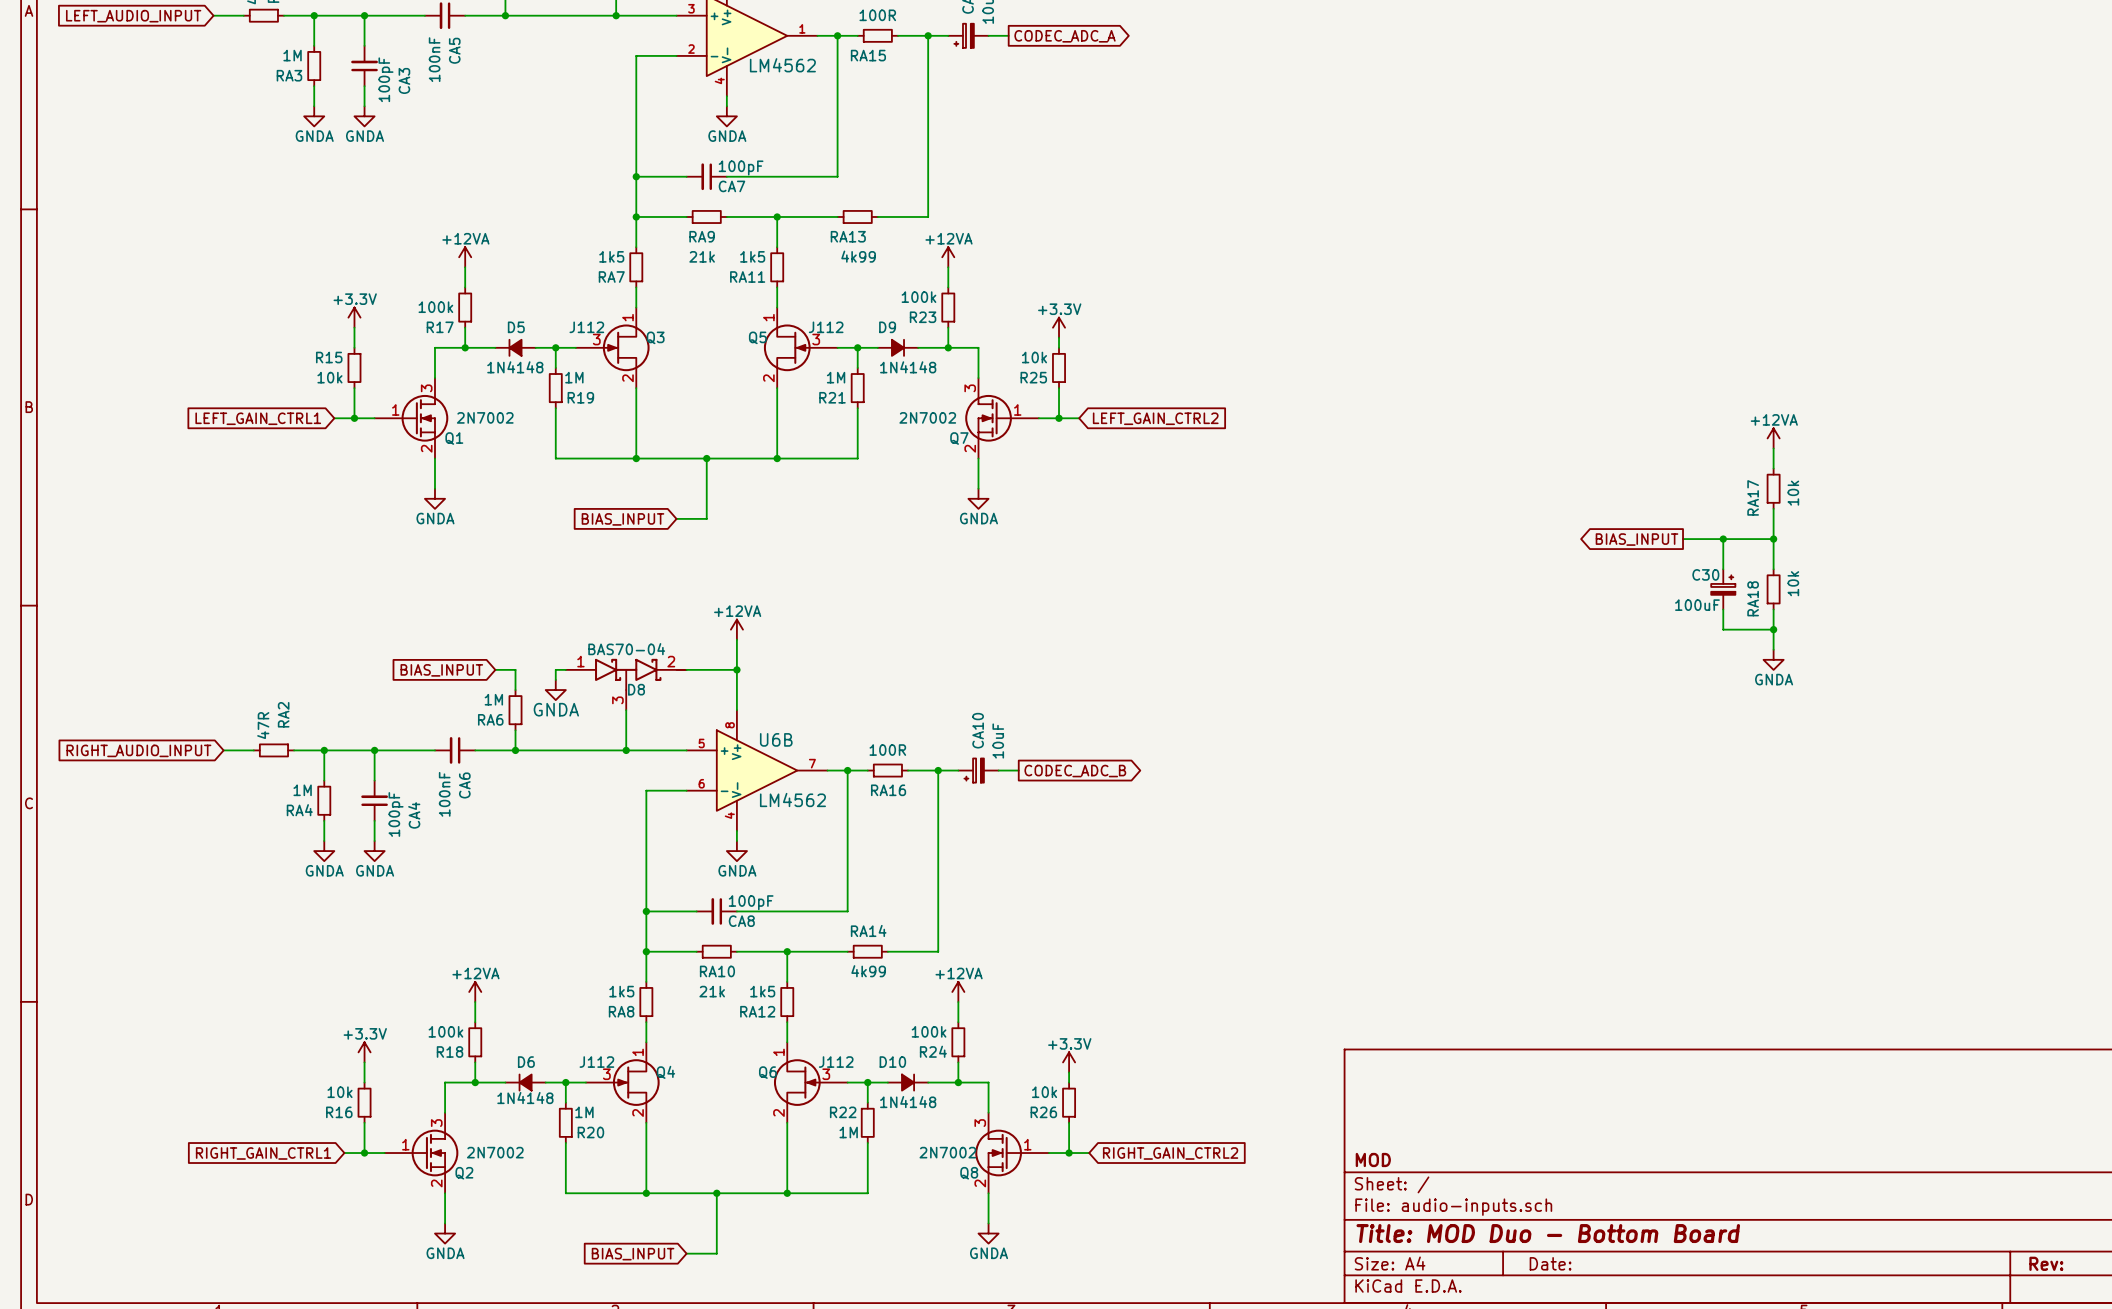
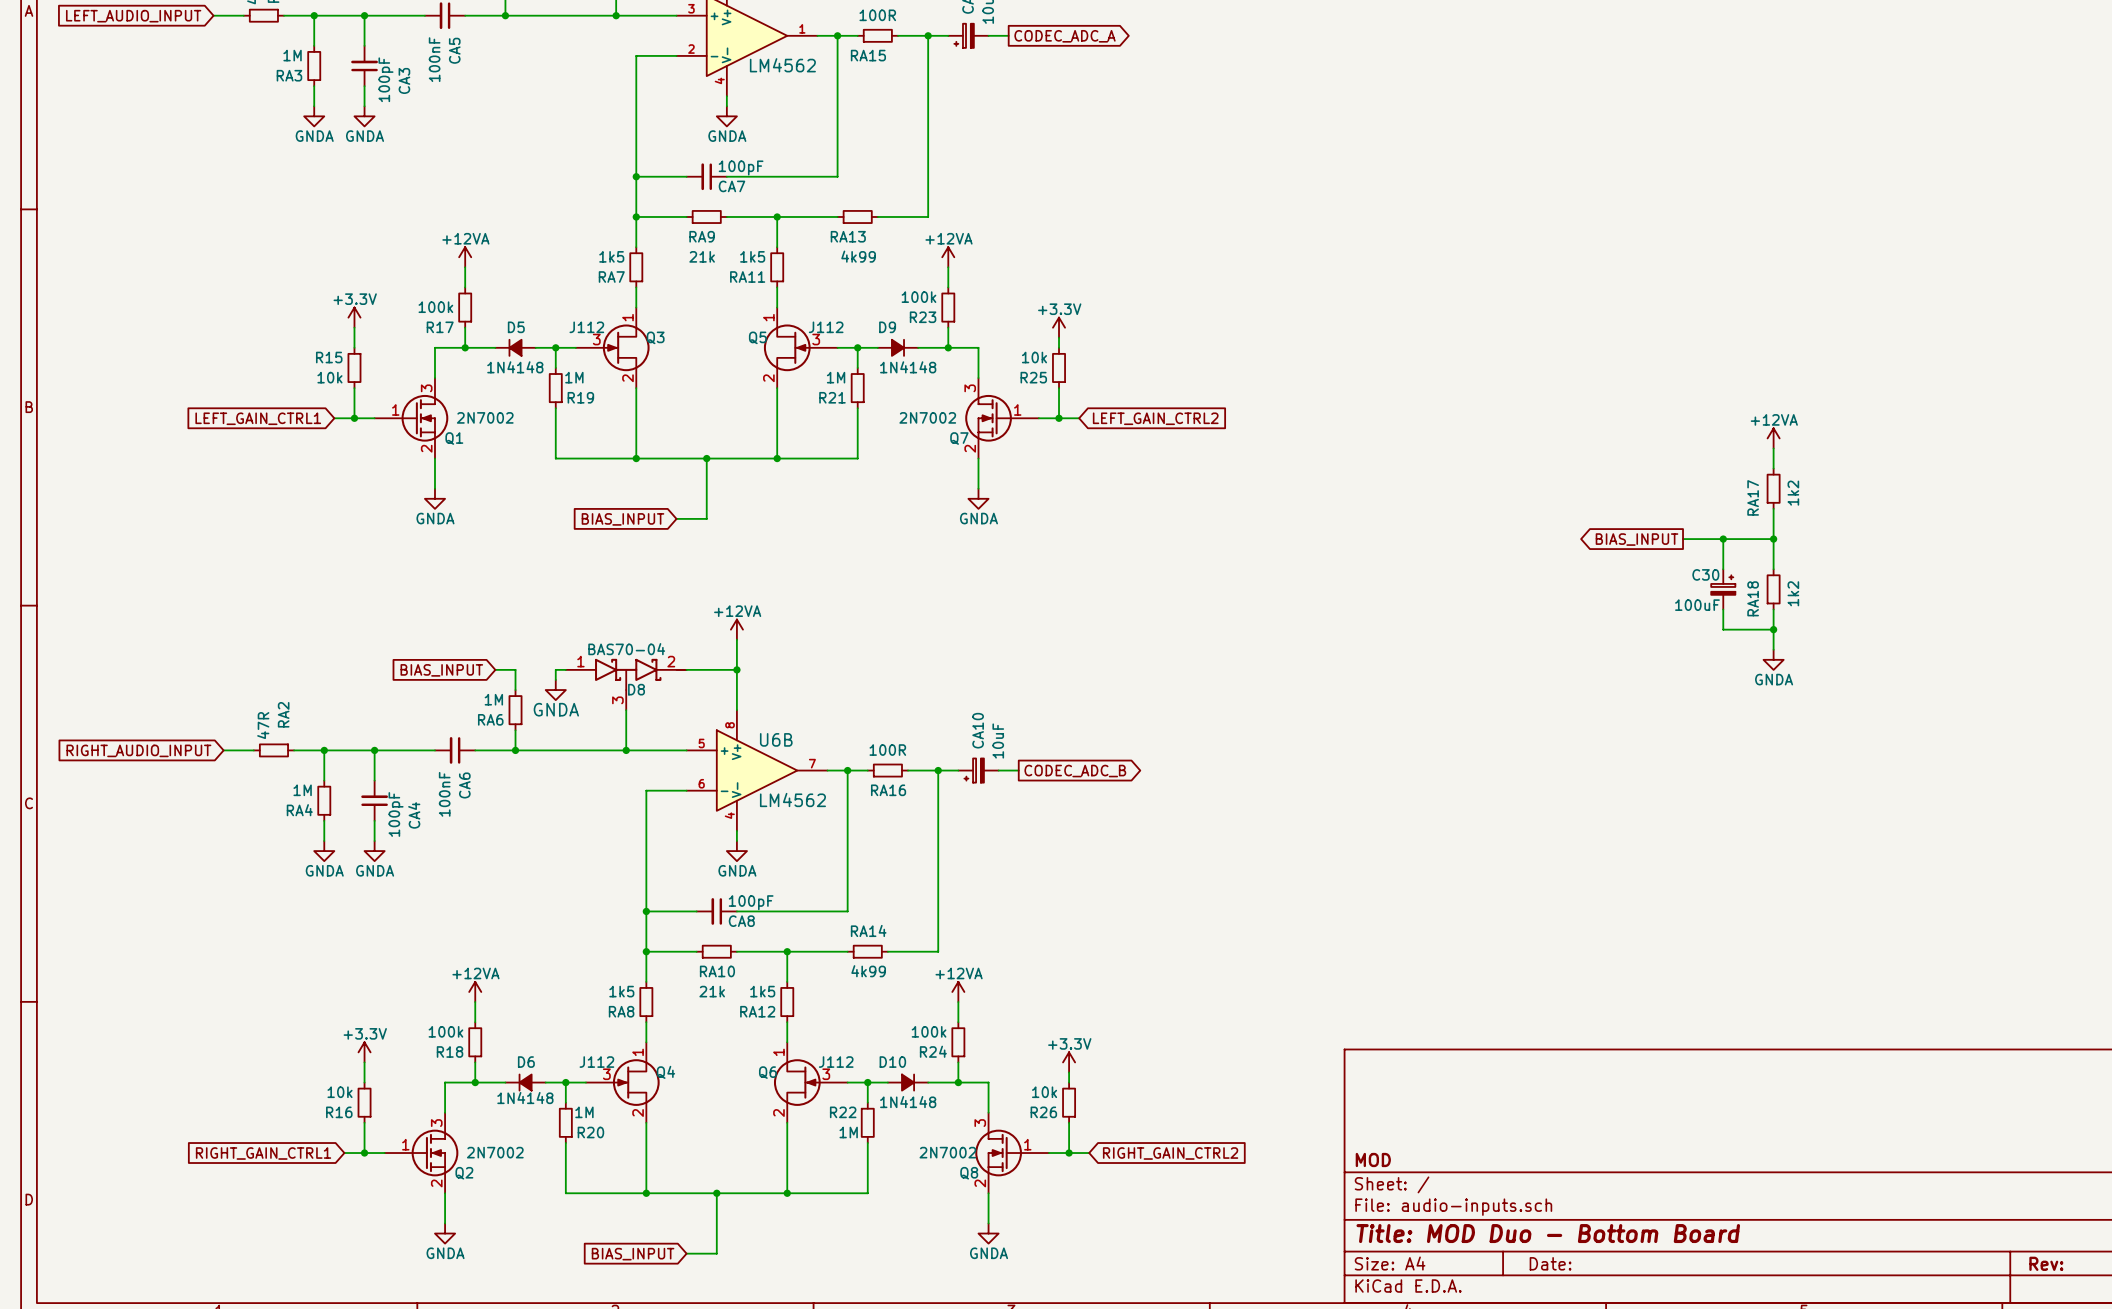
RA17 value: 10k (1793, 493) -> 1k2 (1793, 493)
RA18 value: 10k (1793, 583) -> 1k2 (1793, 593)

